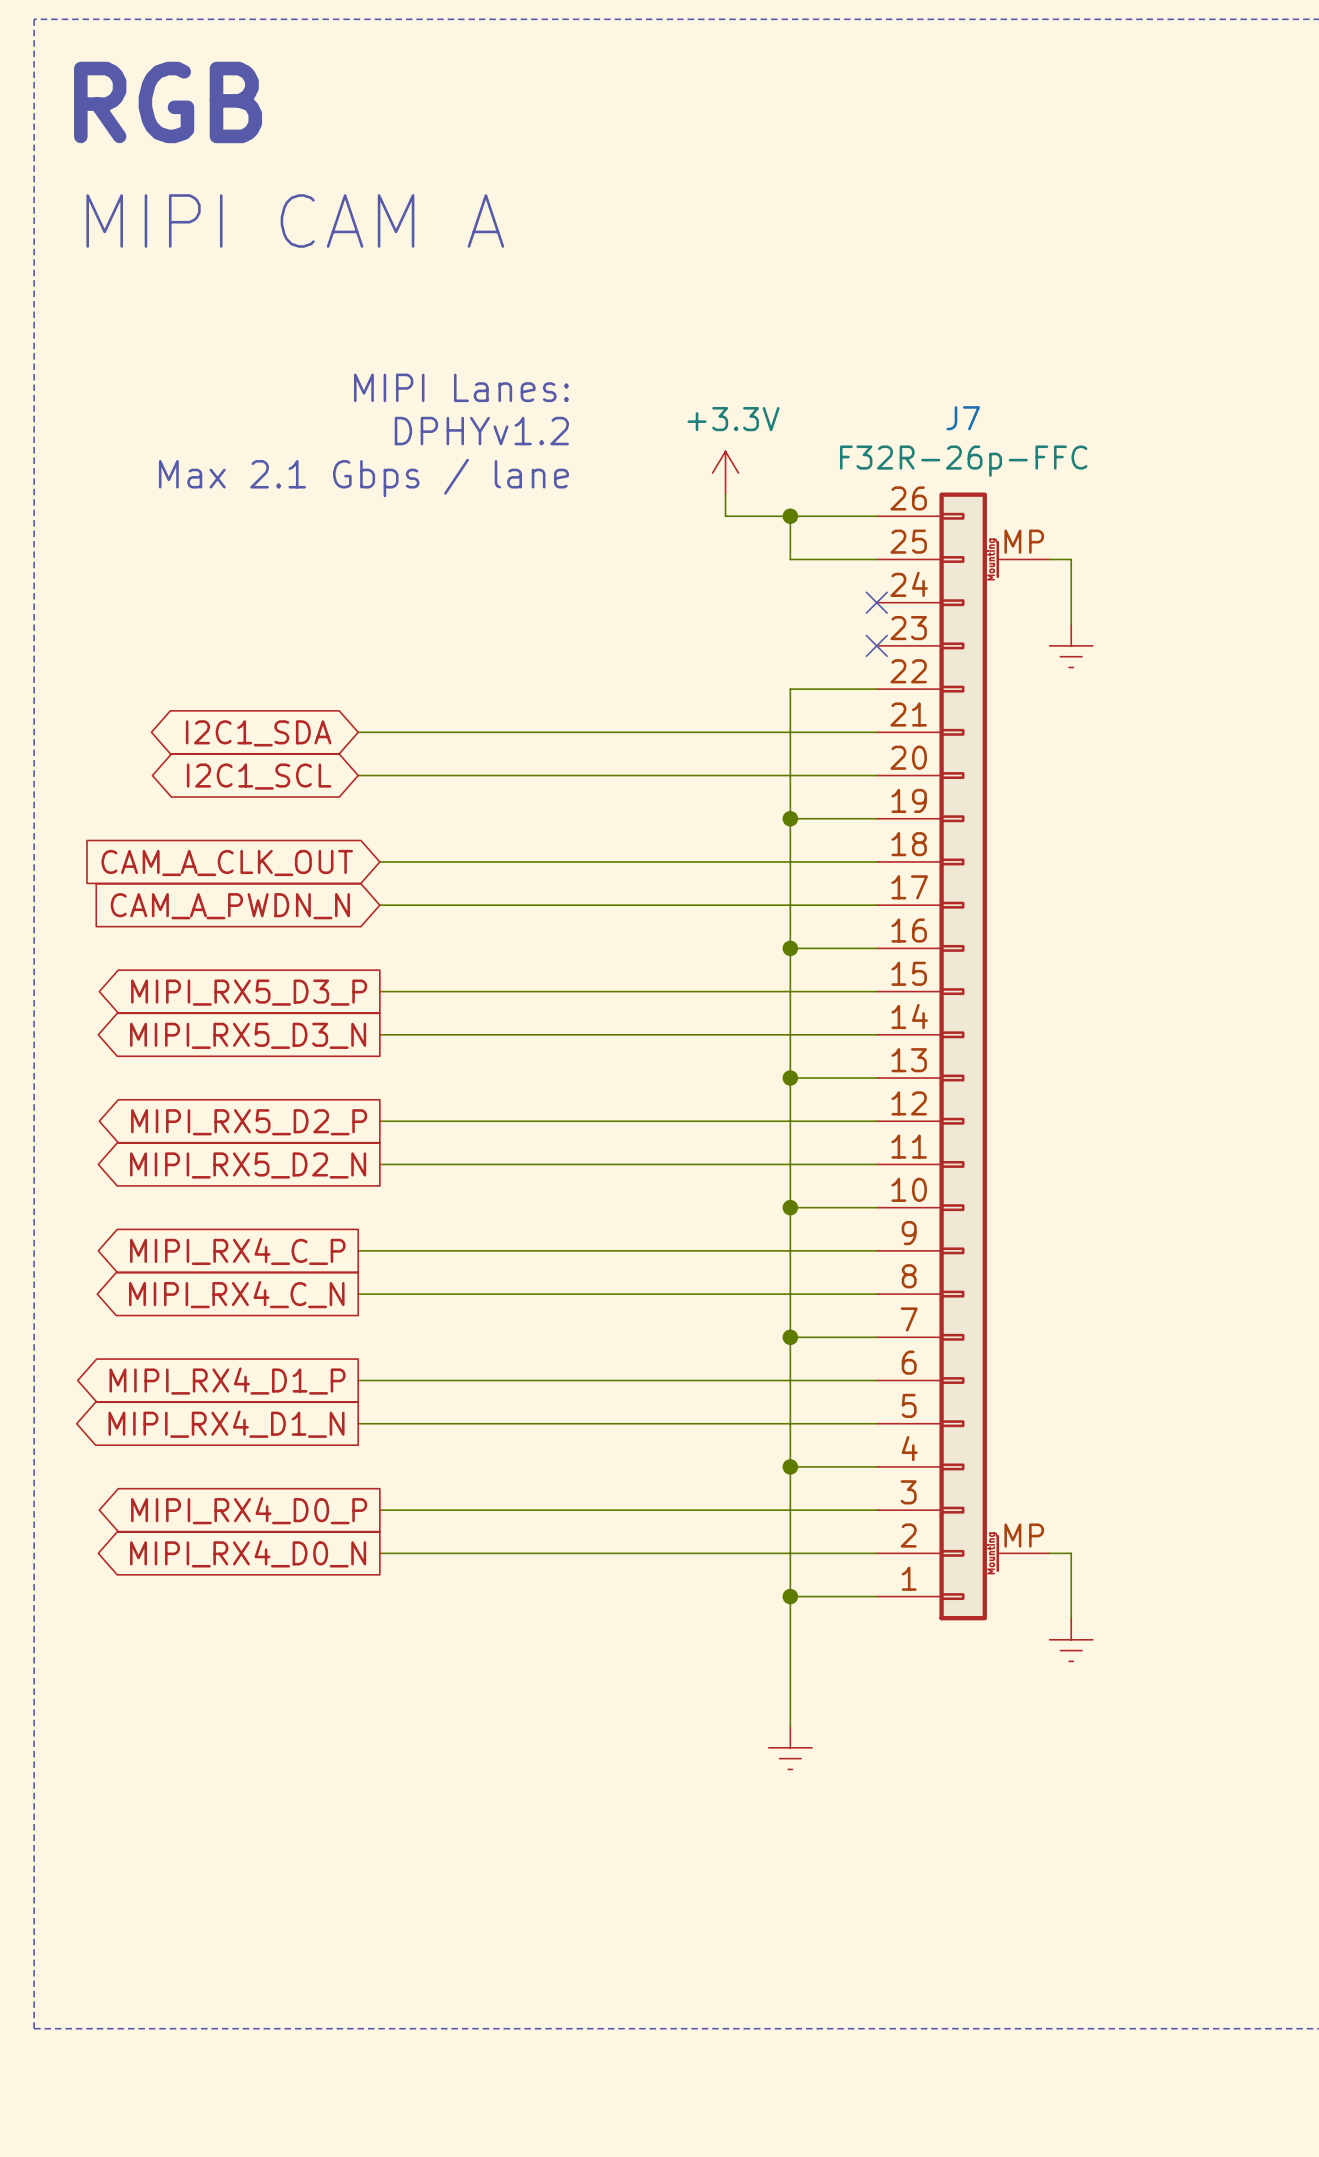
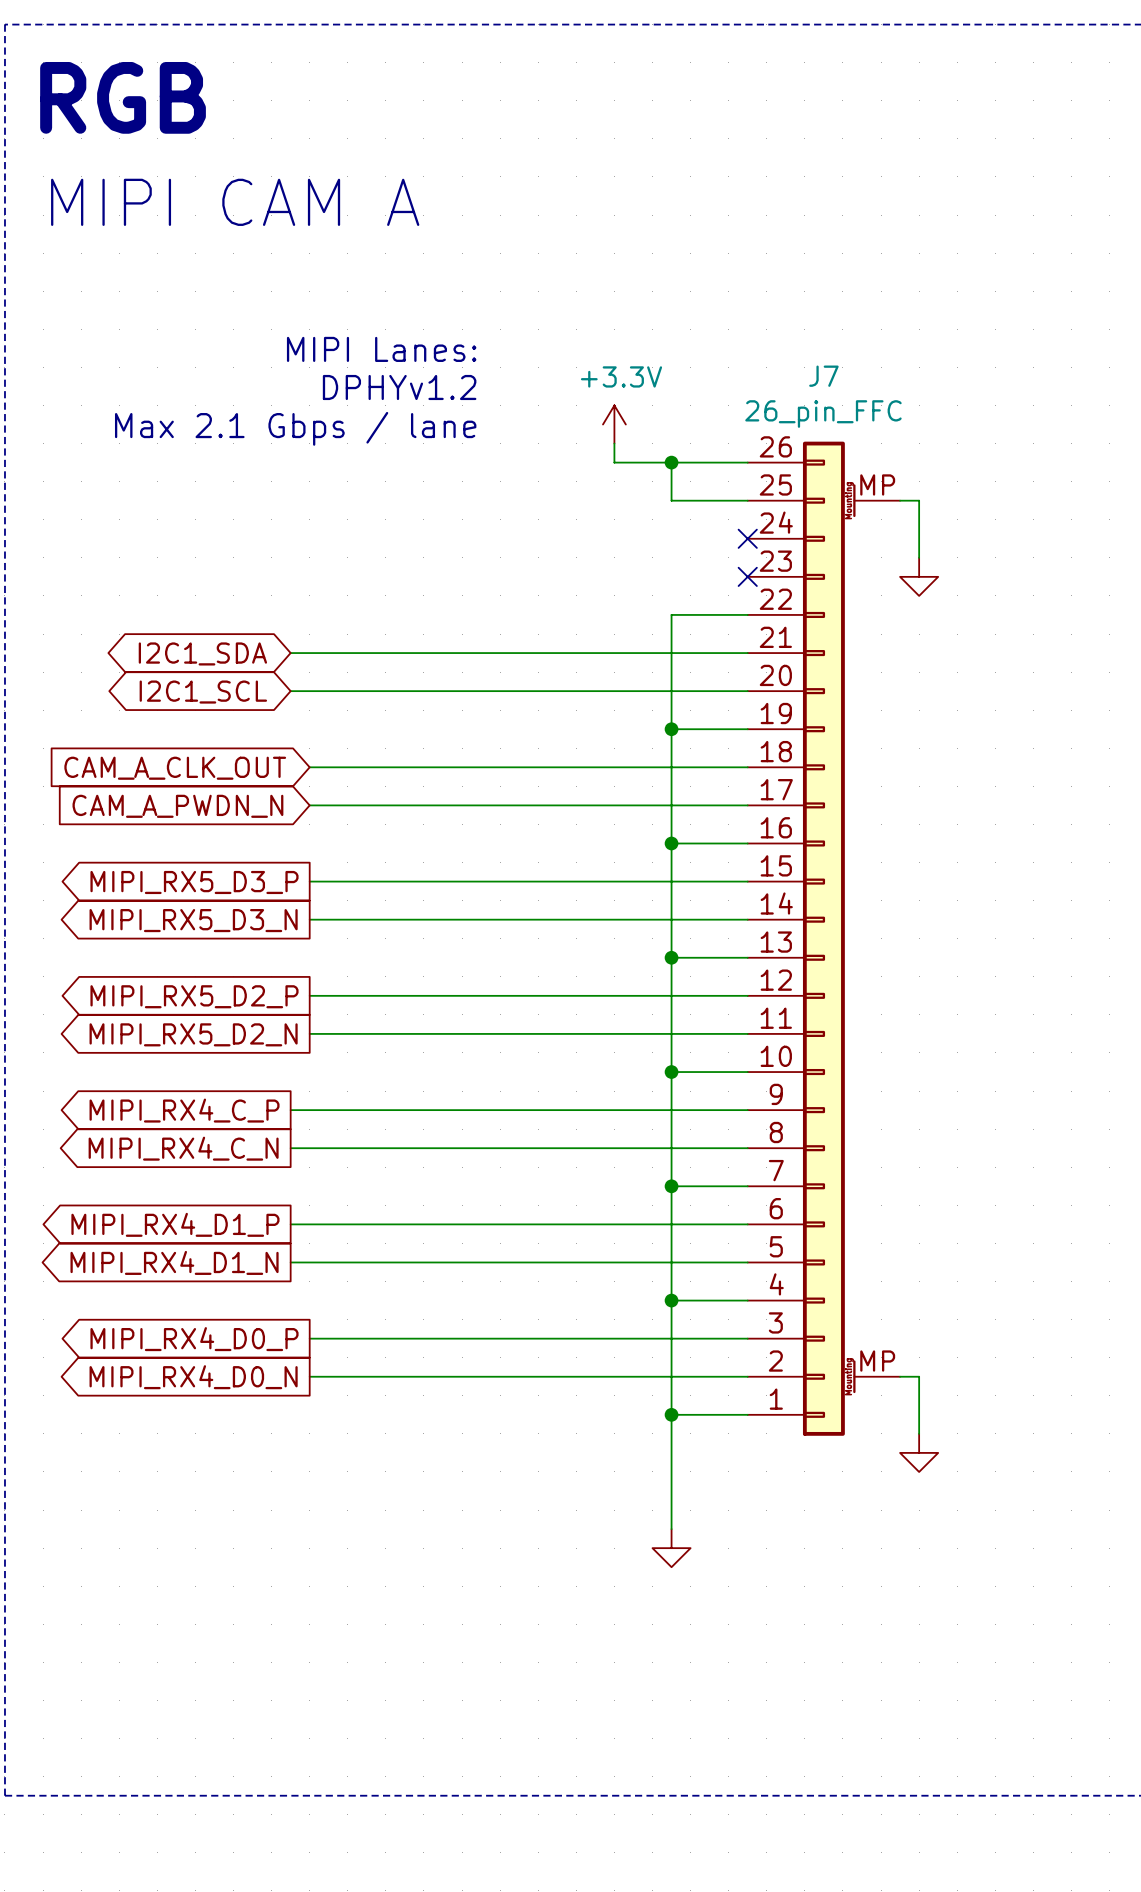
J7 value: F32R-26p-FFC (963, 461) -> 26_pin_FFC (823, 414)
power symbol shape: [1049, 624, 1093, 668] -> [900, 557, 939, 596]
power symbol shape: [1049, 1618, 1093, 1662] -> [900, 1433, 939, 1472]
power symbol shape: [768, 1726, 812, 1770] -> [652, 1529, 691, 1568]

